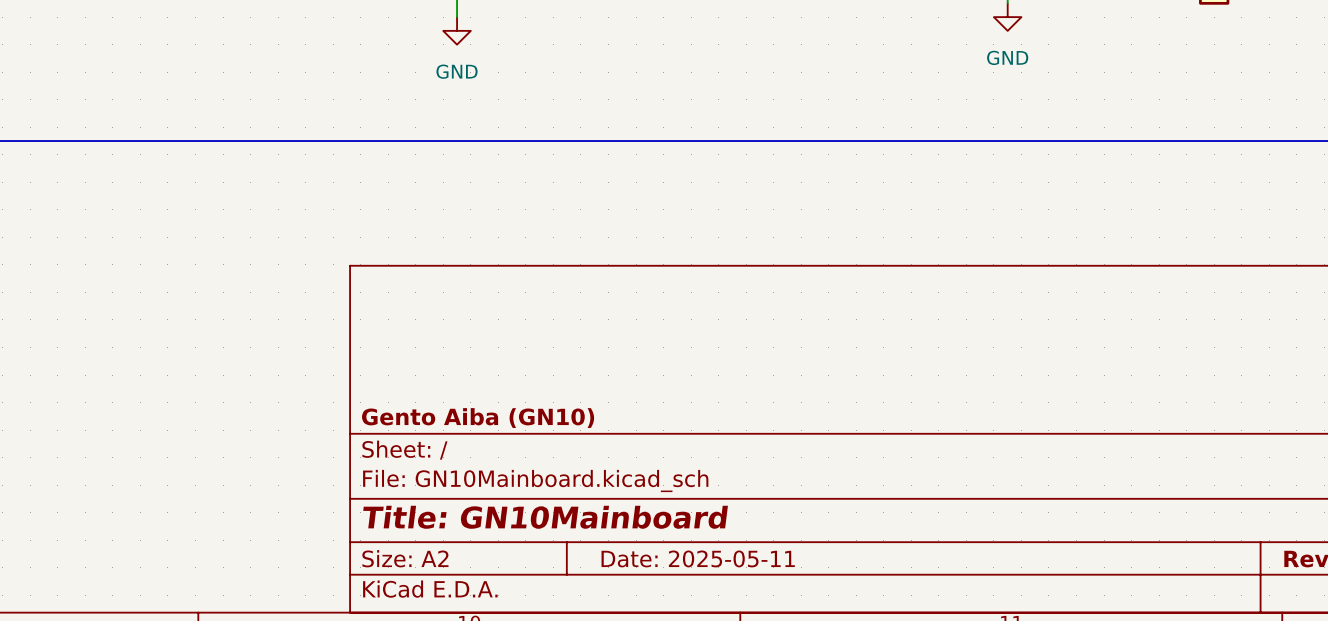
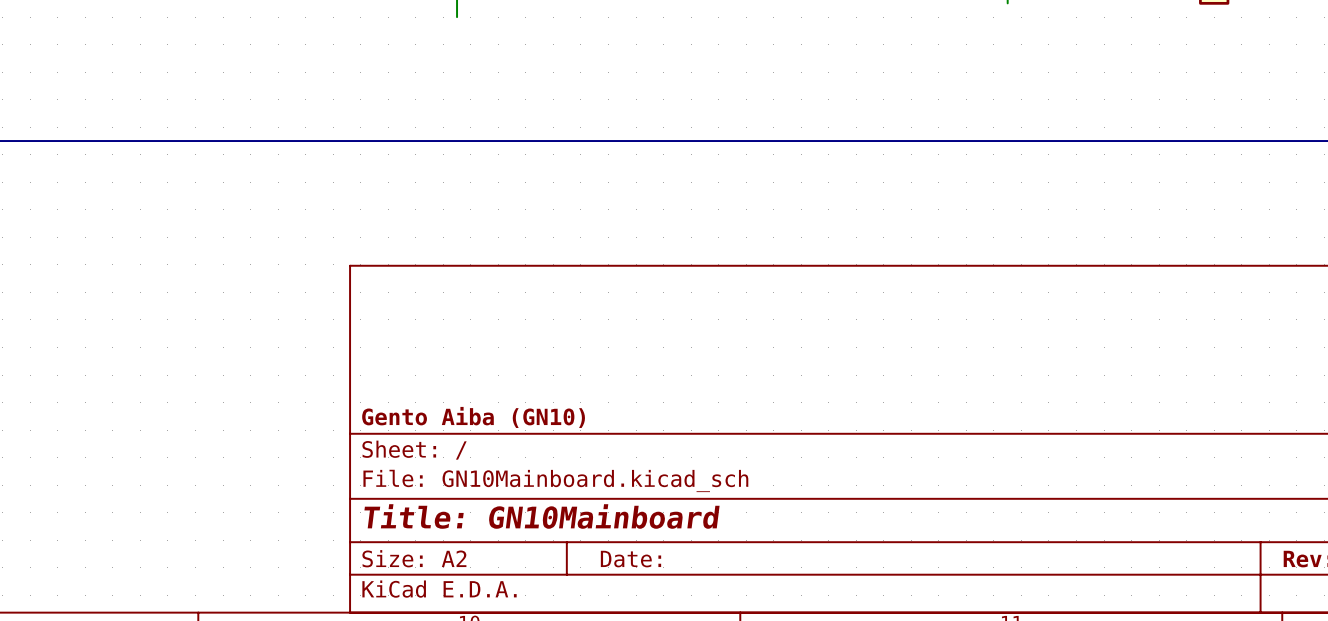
power symbol: GND (1007, 17) -> none
power symbol: GND (457, 30) -> none
title block: Date: 2025-05-11 (698, 558) -> Date: (631, 559)

